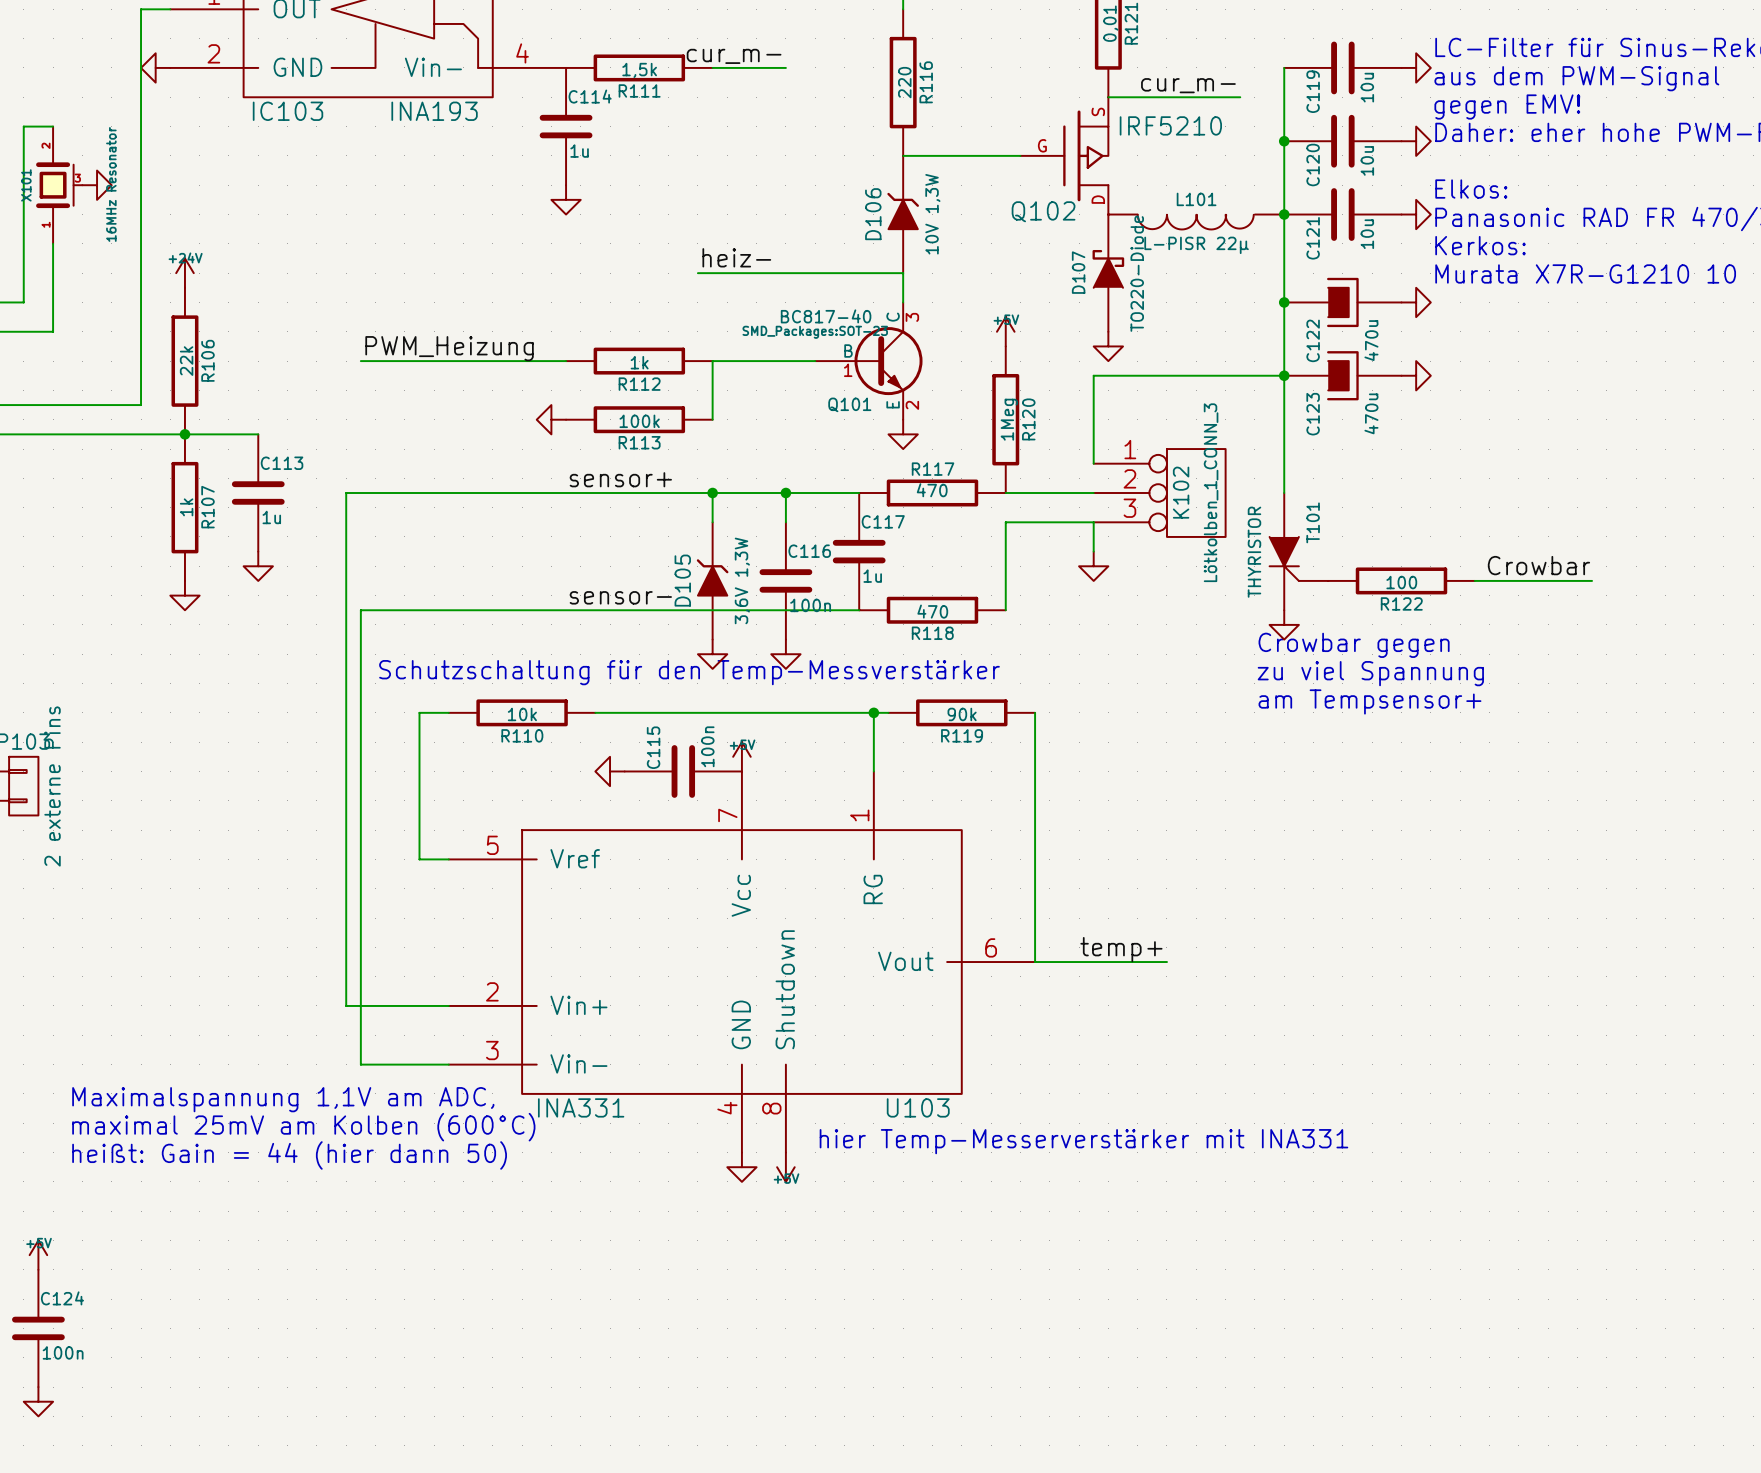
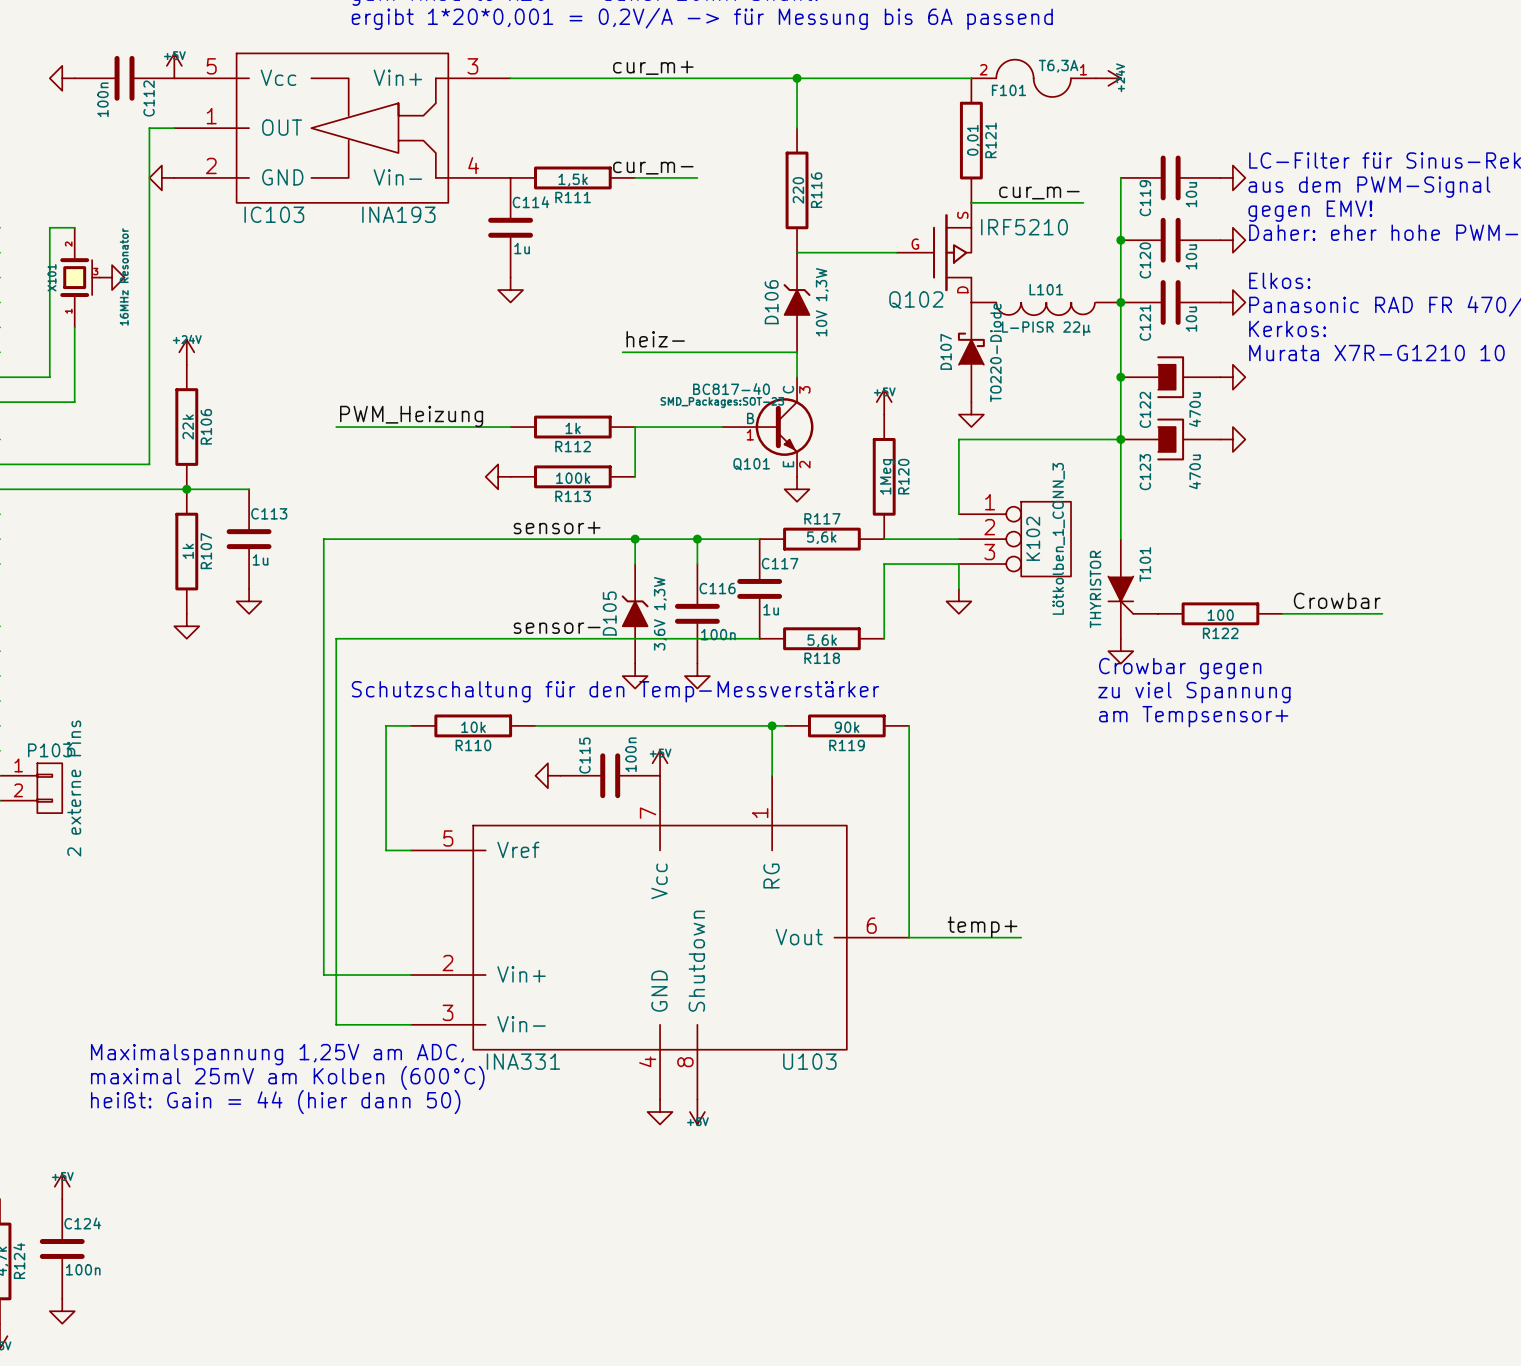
R117 value: 470 (932, 490) -> 5,6k (821, 537)
R118 value: 470 (932, 611) -> 5,6k (822, 640)
text: Maximalspannung 1,1V am ADC, (283, 1099) -> Maximalspannung 1,25V am ADC, (277, 1054)
text: hier Temp-Messerverstärker mit INA331 (1083, 1141) -> none

